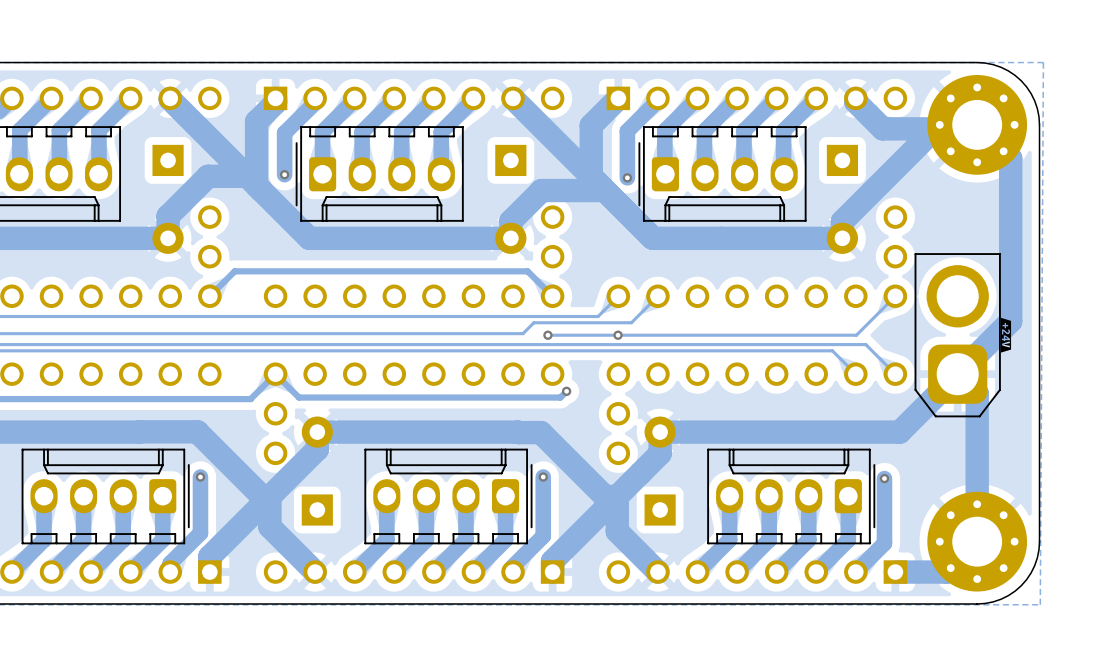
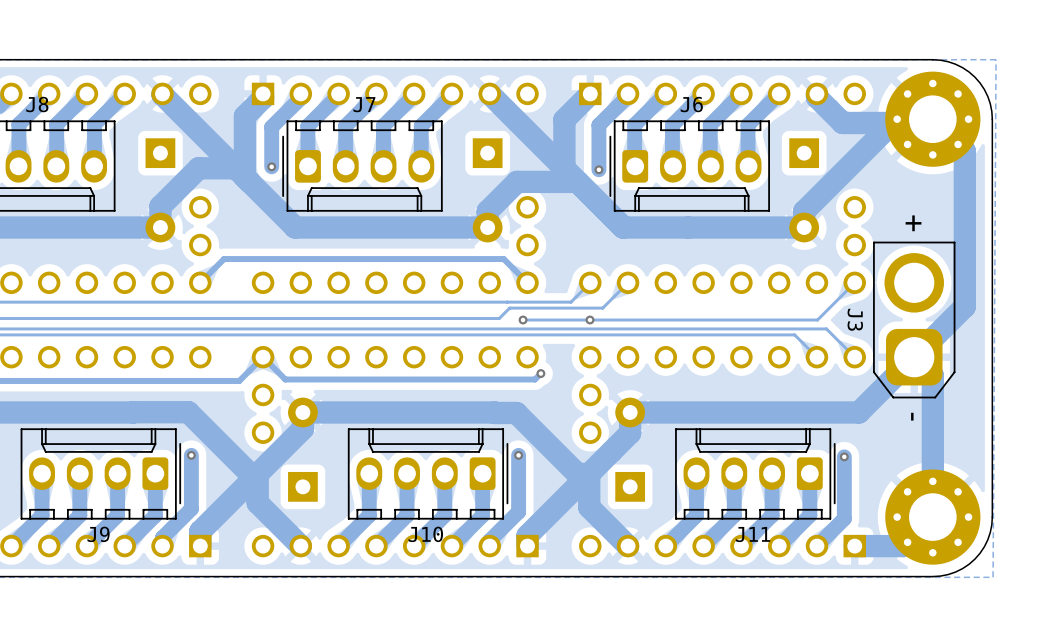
J8 name: none -> J8 (37, 104)
J7 name: none -> J7 (364, 104)
J6 name: none -> J6 (691, 104)
J3 text: none -> + (913, 223)
drawing: [1000, 317, 1012, 353] -> none
J3 name: none -> J3 (855, 319)
J3 text: none -> - (912, 416)
J9 name: none -> J9 (98, 534)
J10 name: none -> J10 (425, 534)
J11 name: none -> J11 (753, 534)

